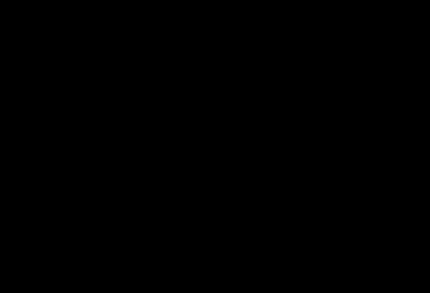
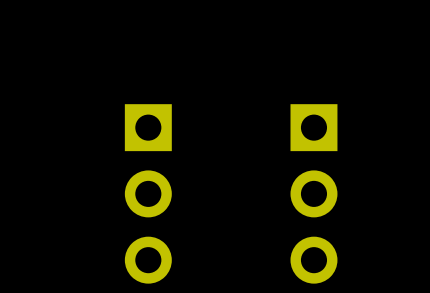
part: none -> (148, 193)
part: none -> (313, 193)

